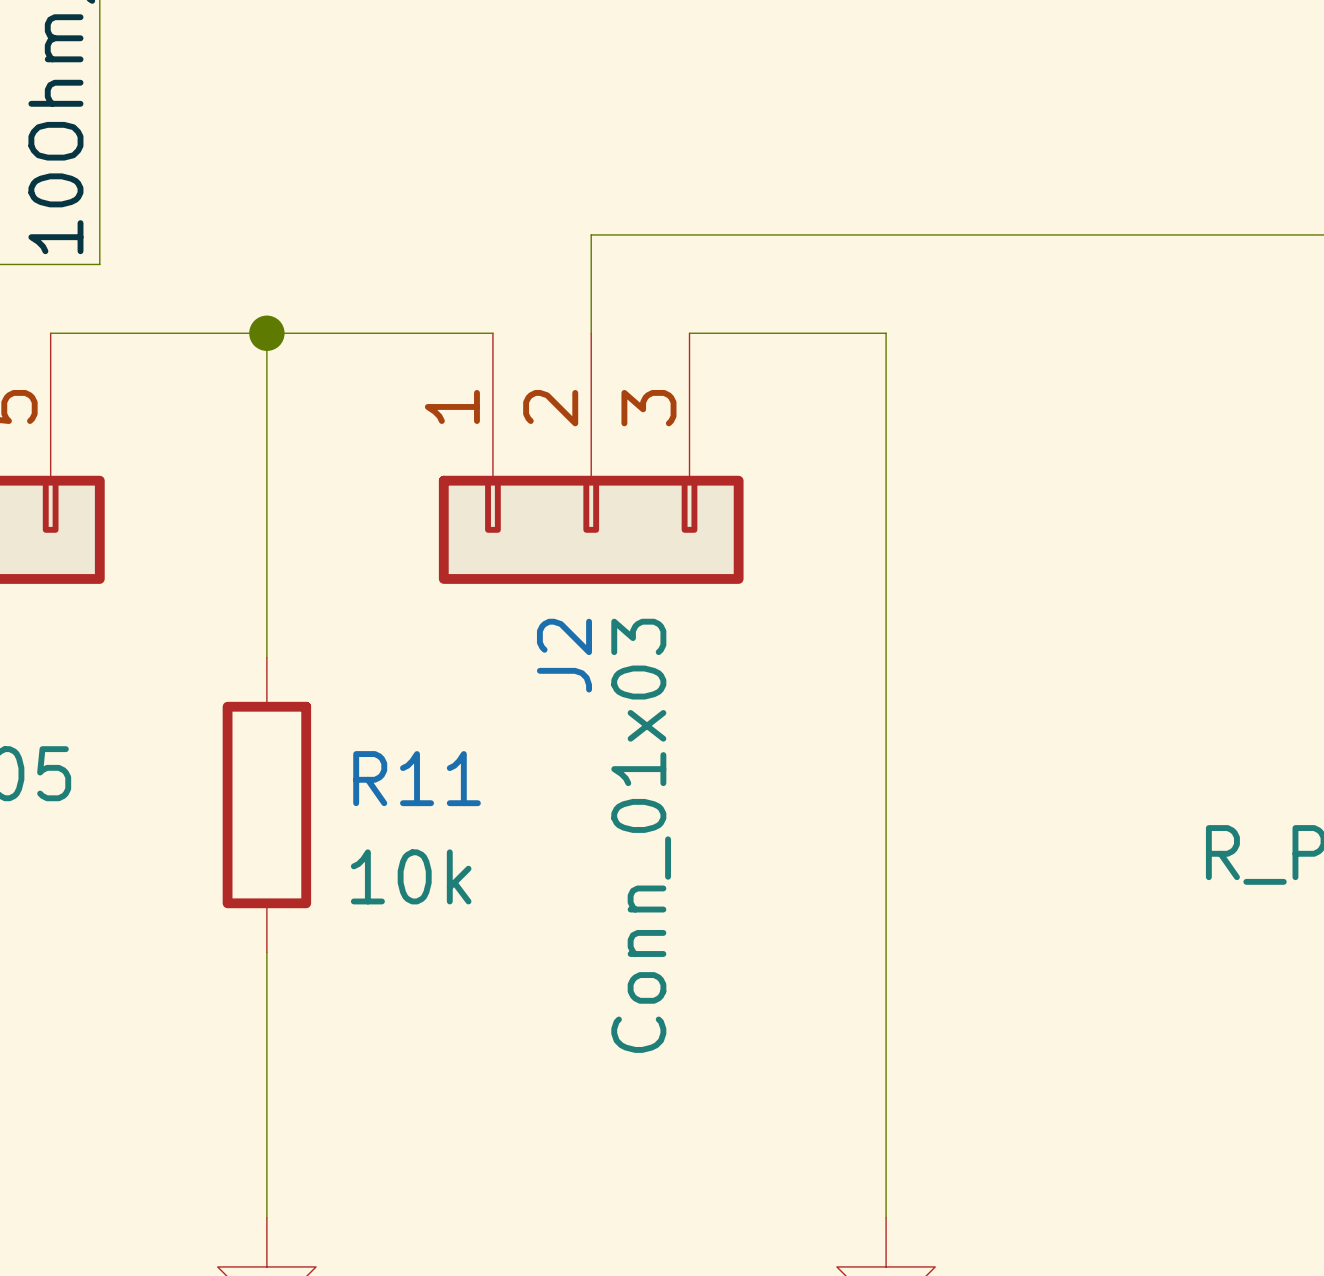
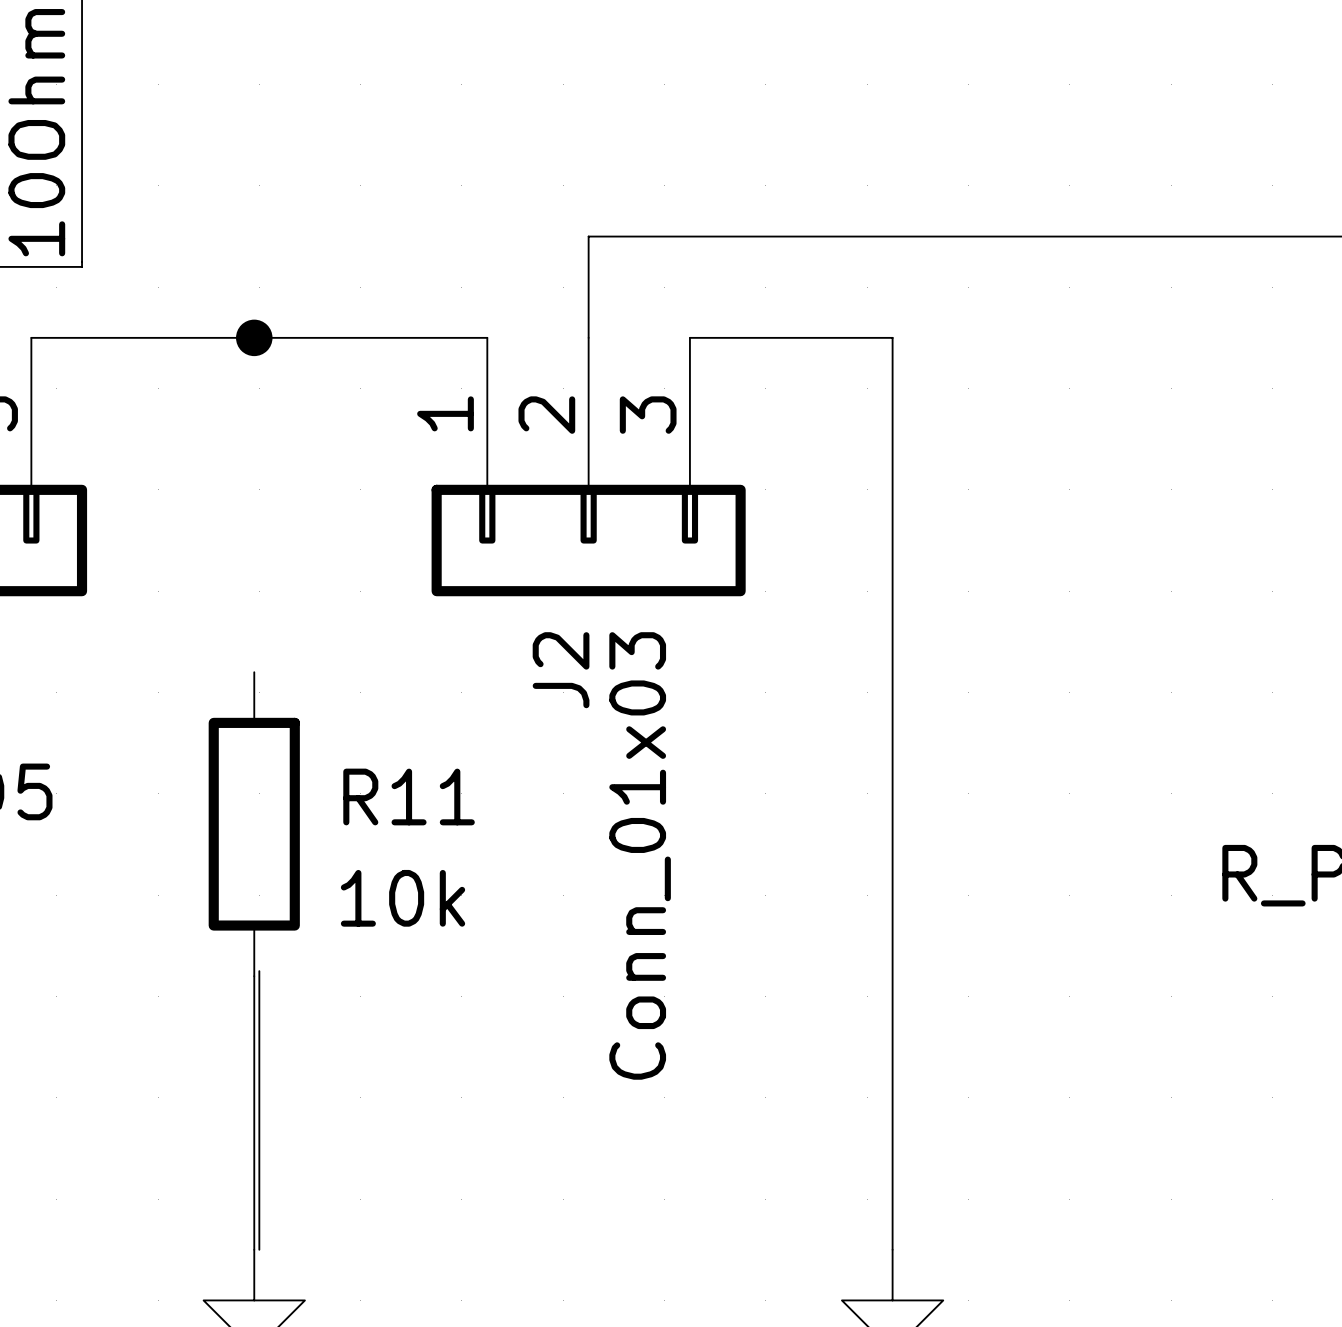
wire: (266, 333) (266, 657) -> none
wire: none -> (259, 971) (259, 1249)

